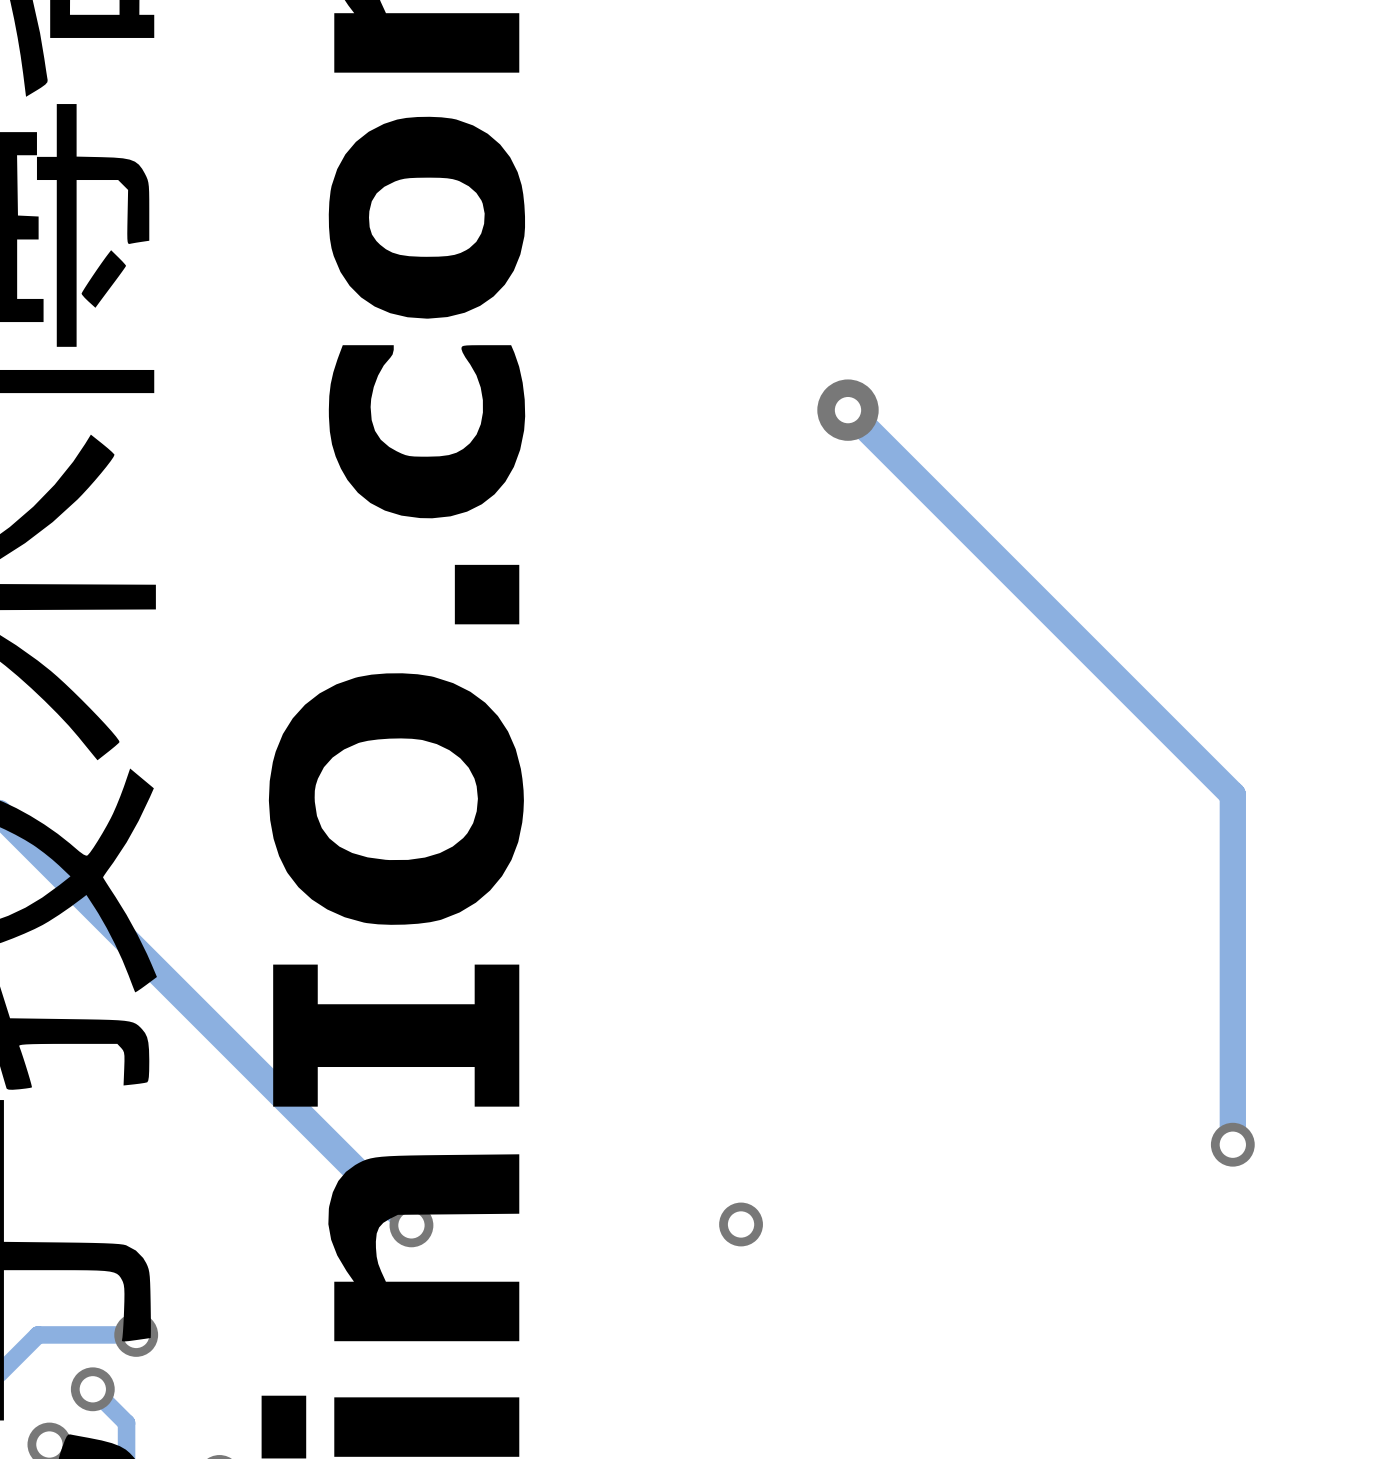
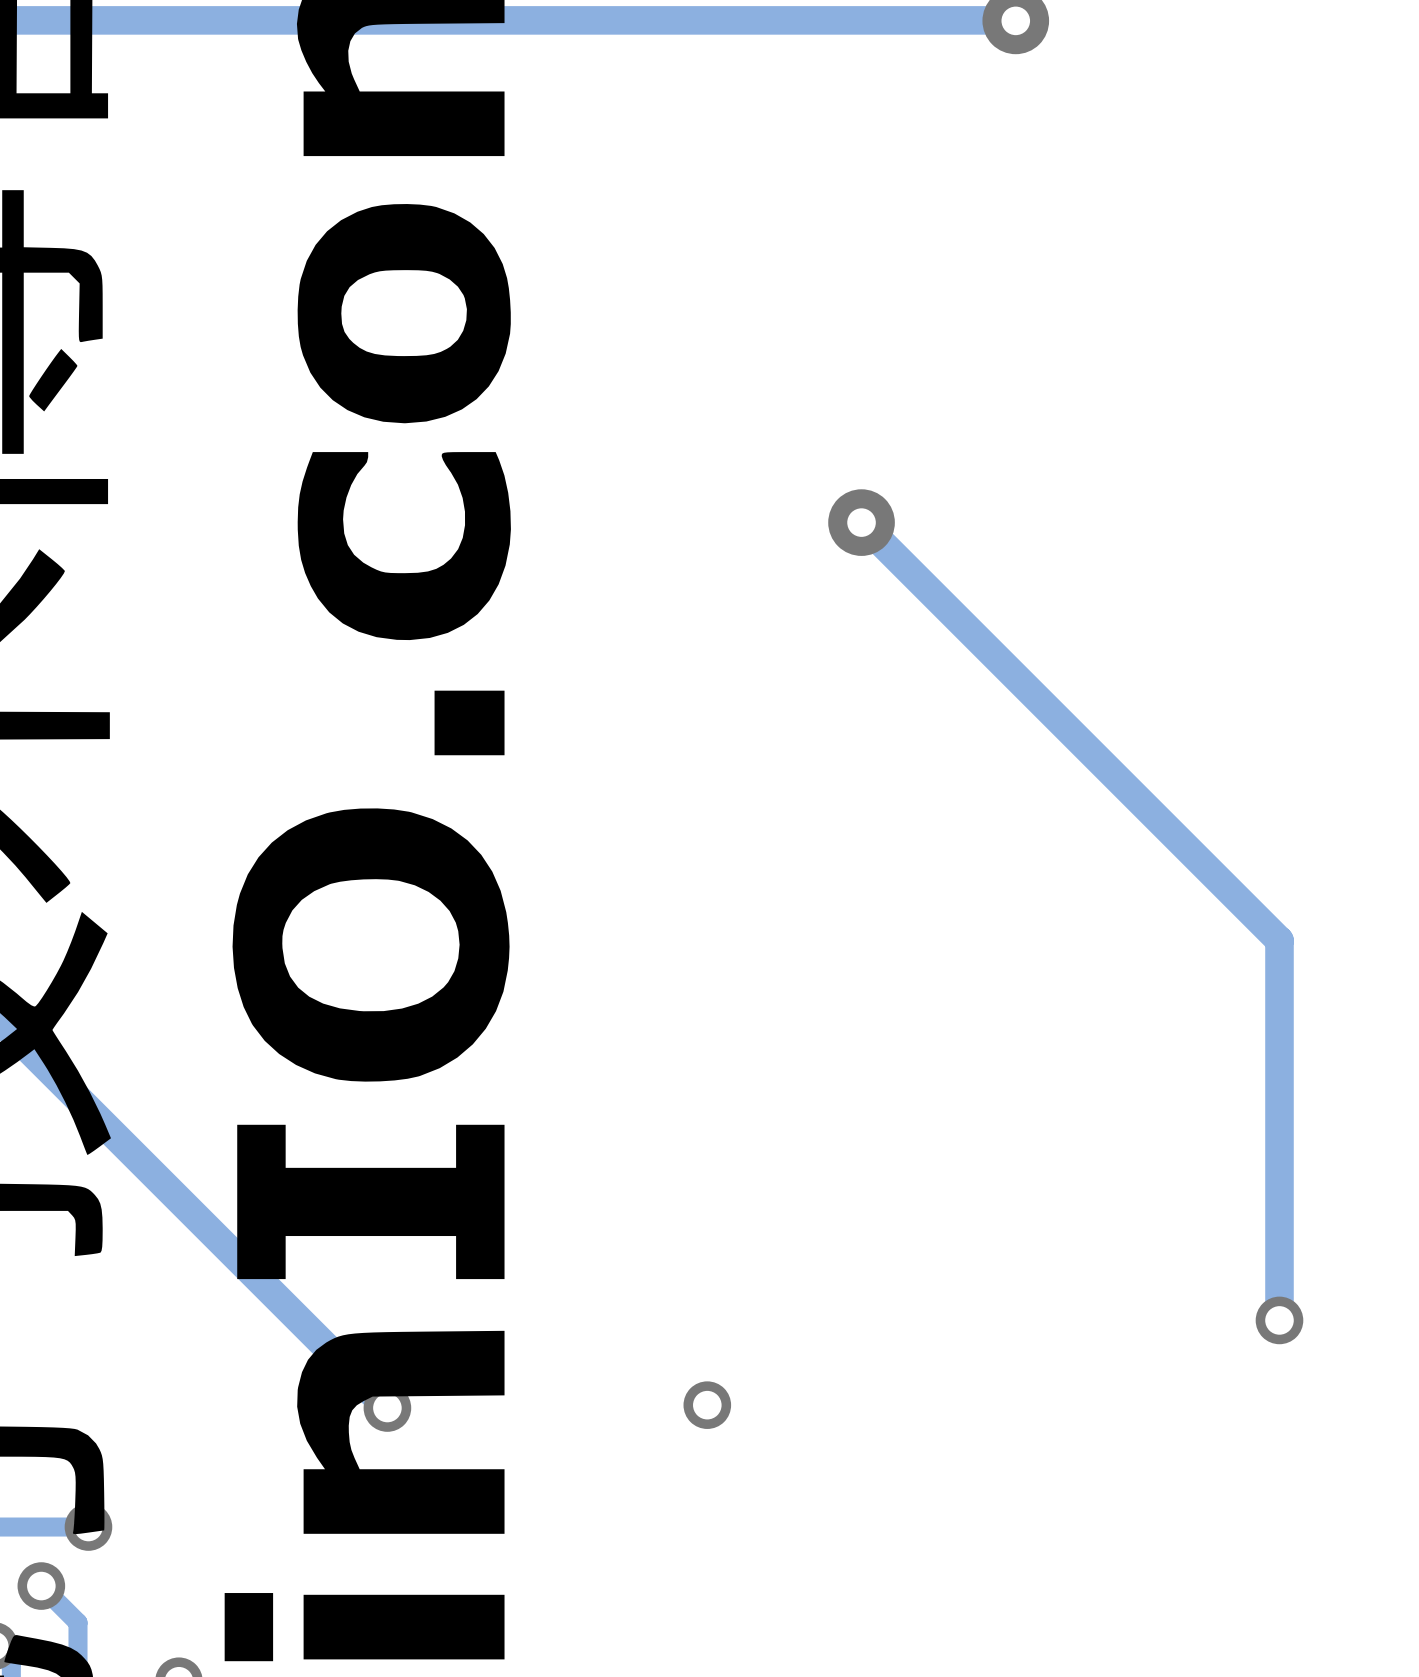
via position: (741, 1224) -> (707, 1405)

